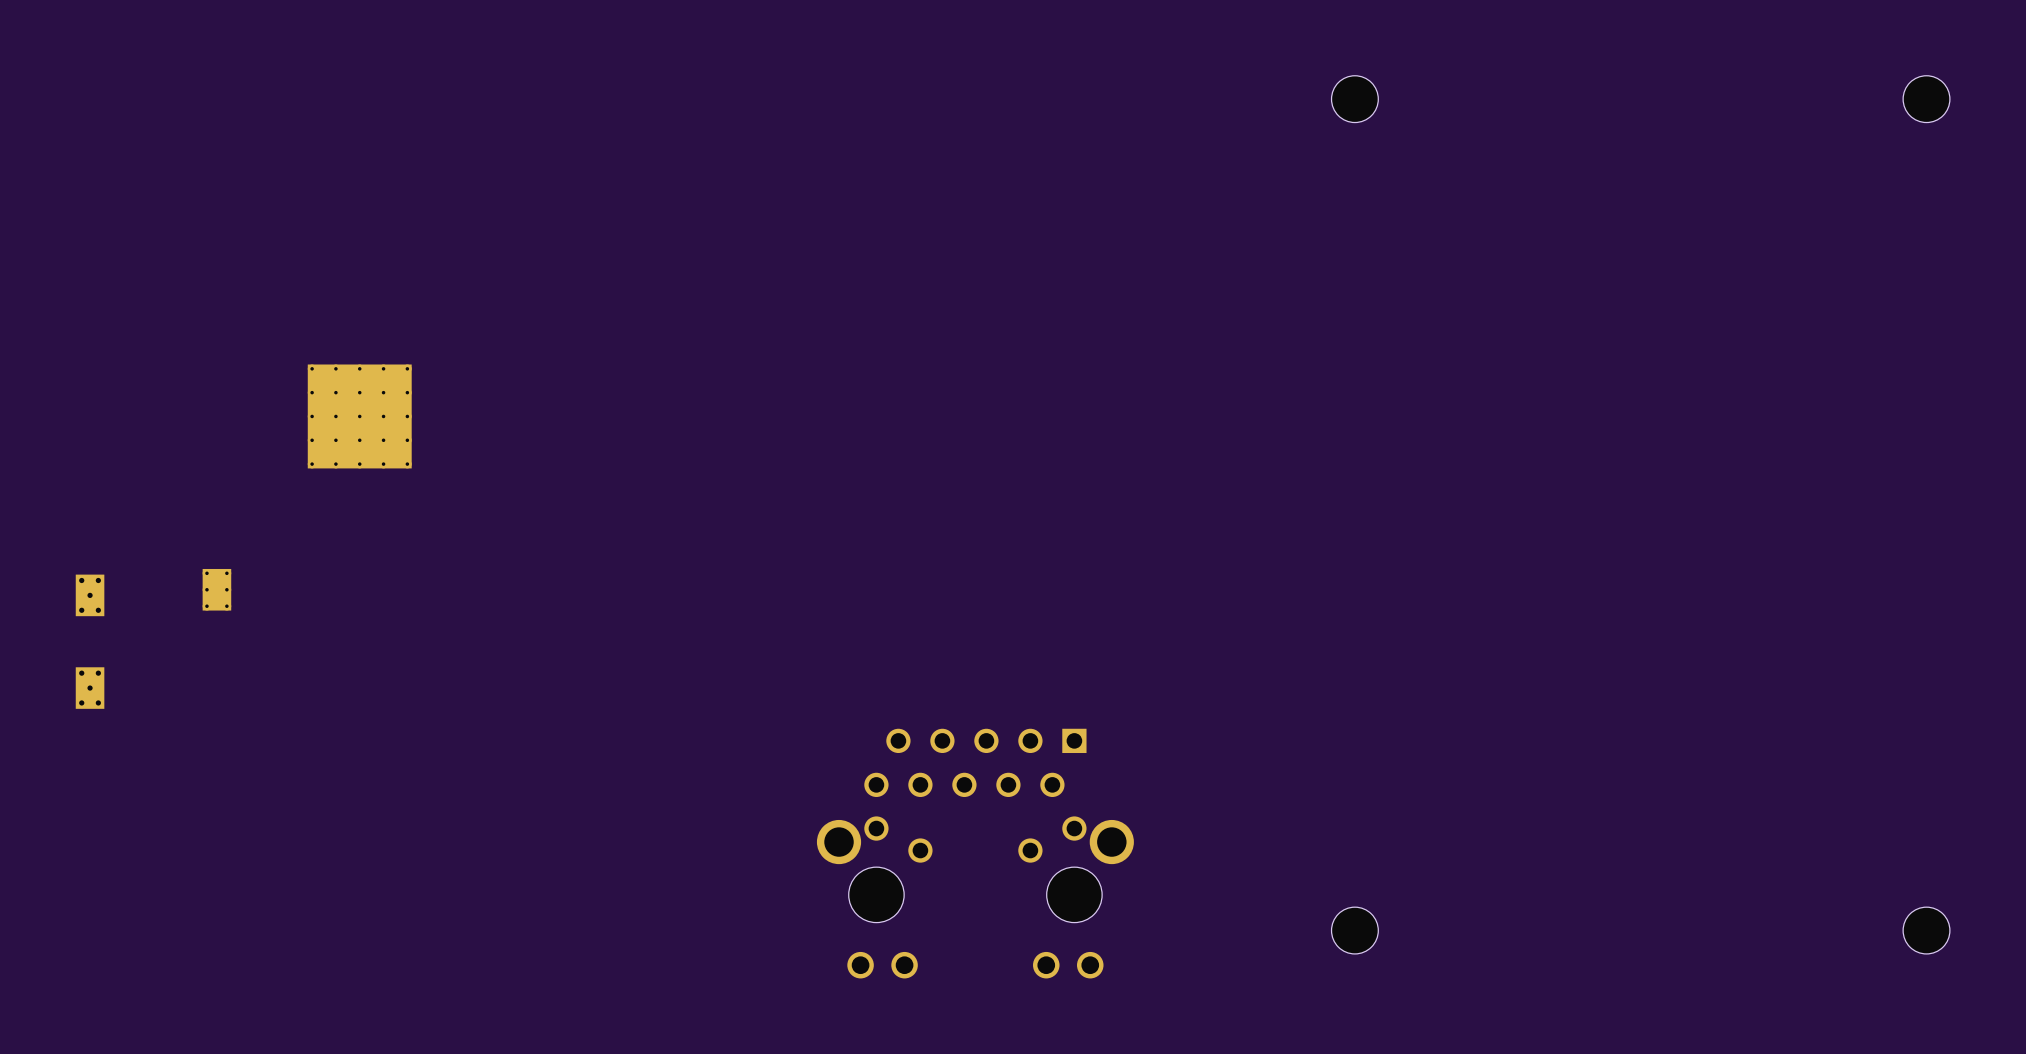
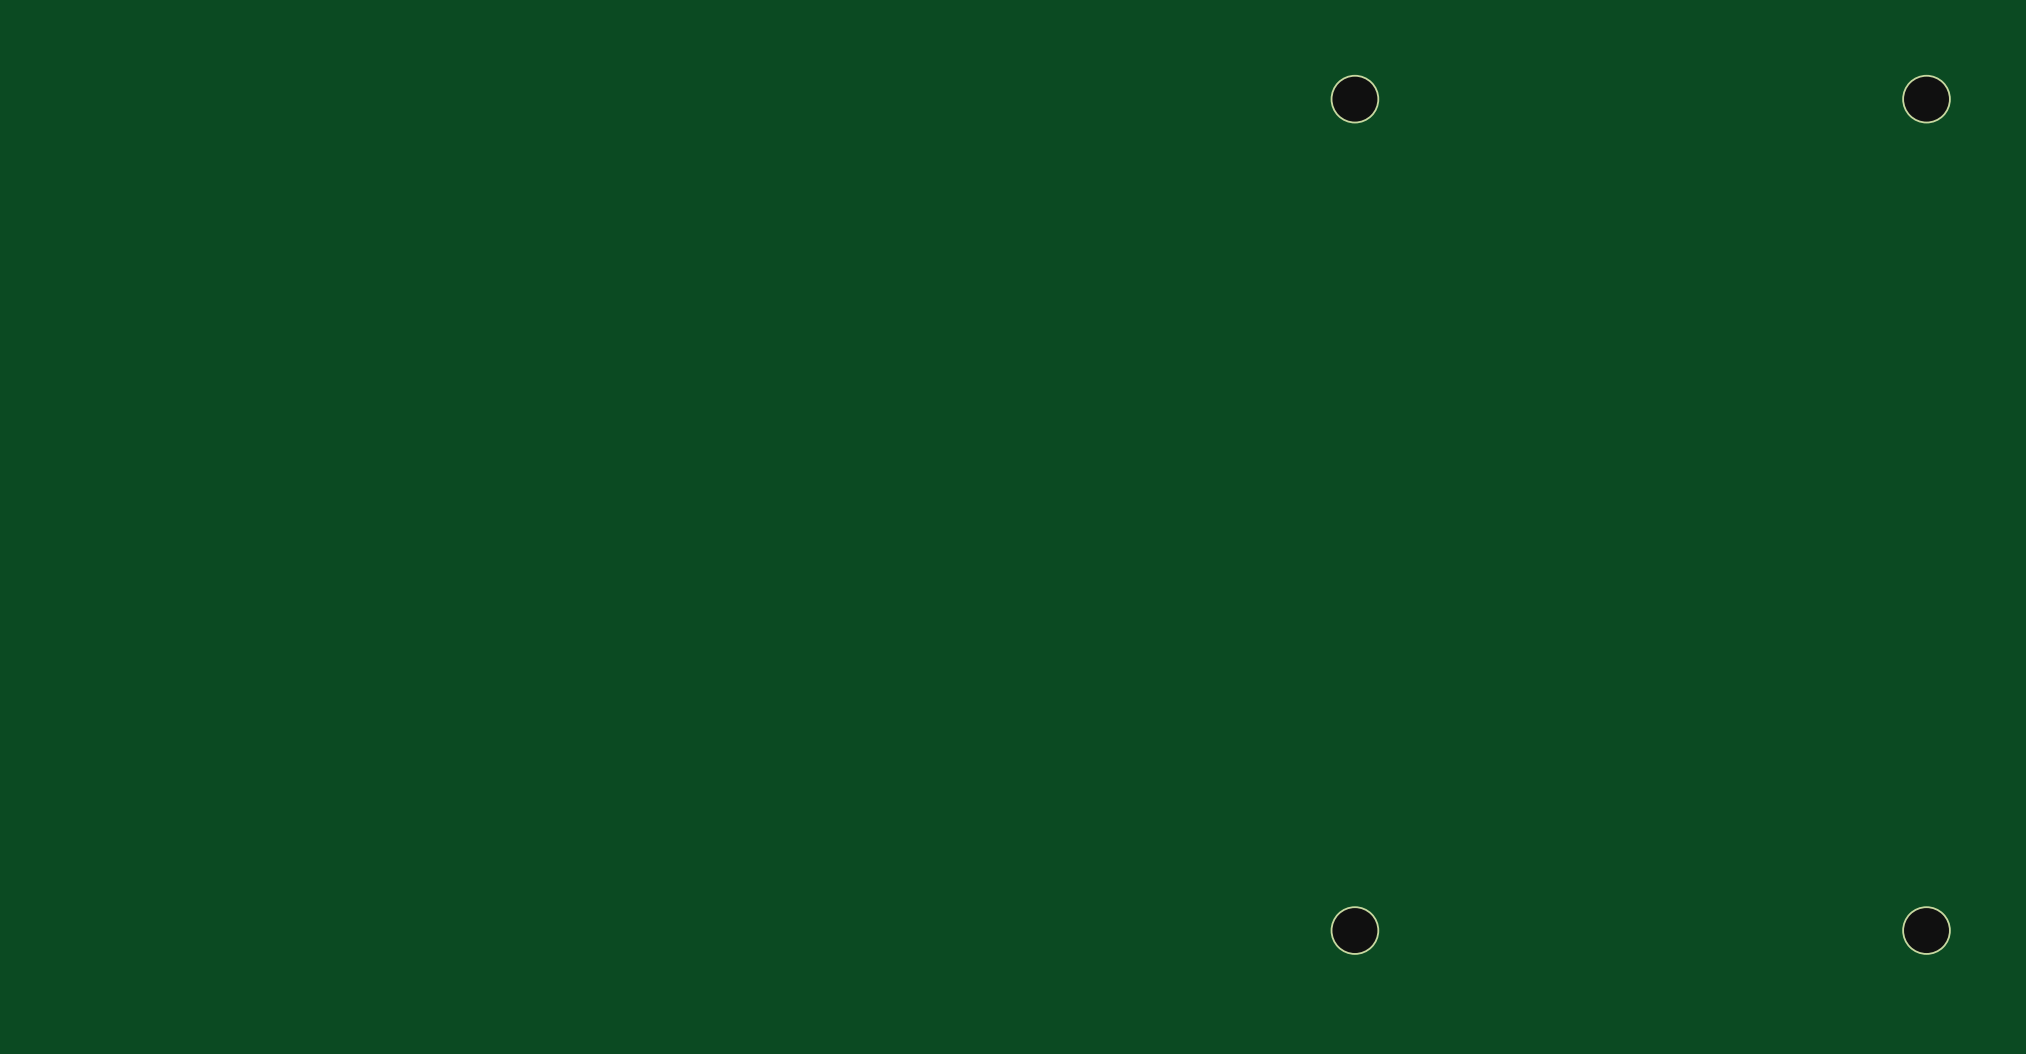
part: (359, 416) -> none
part: (216, 589) -> none
part: (90, 595) -> none
part: (90, 688) -> none
part: (975, 853) -> none

